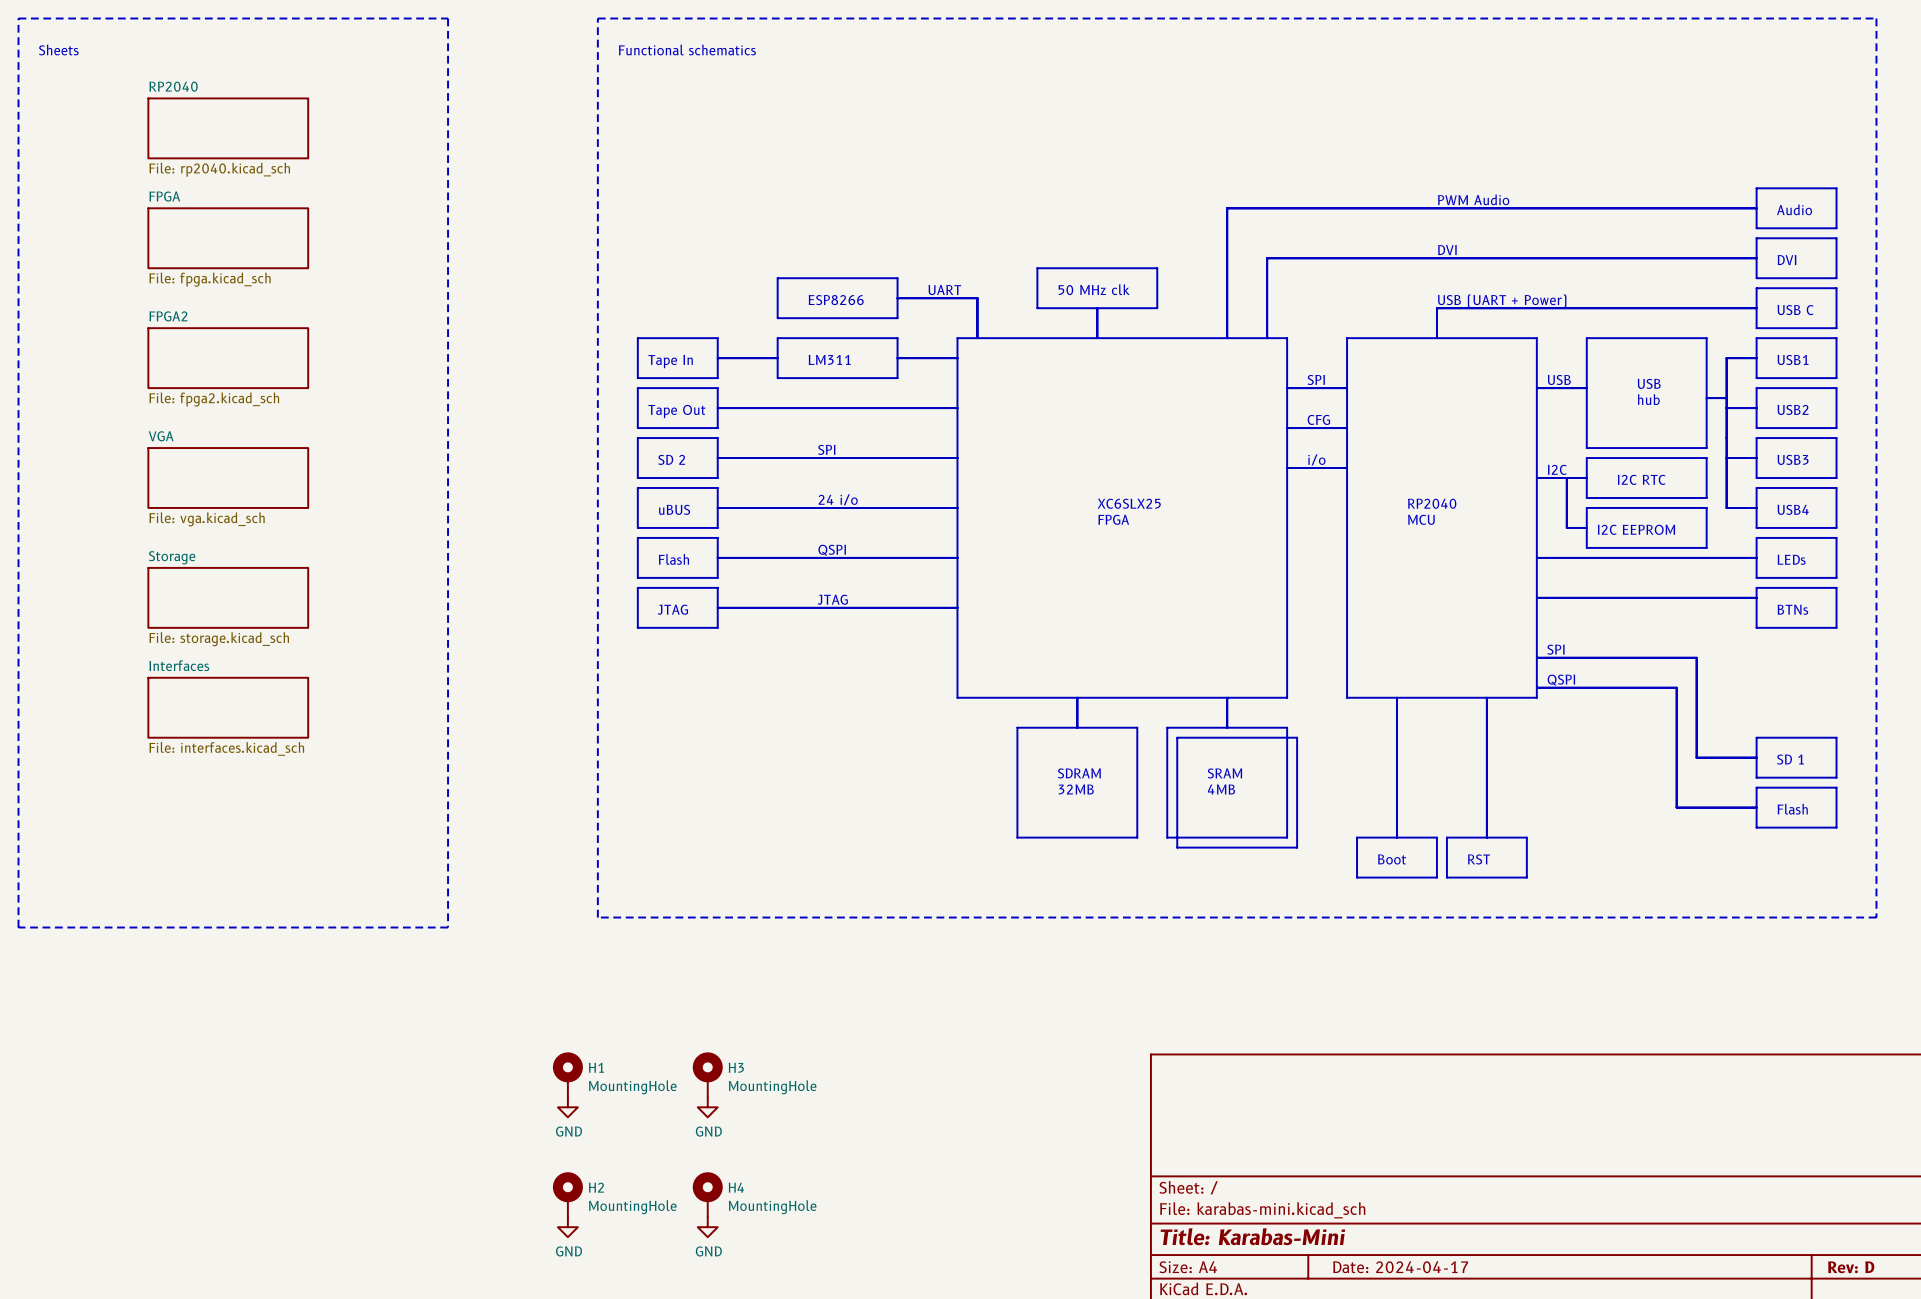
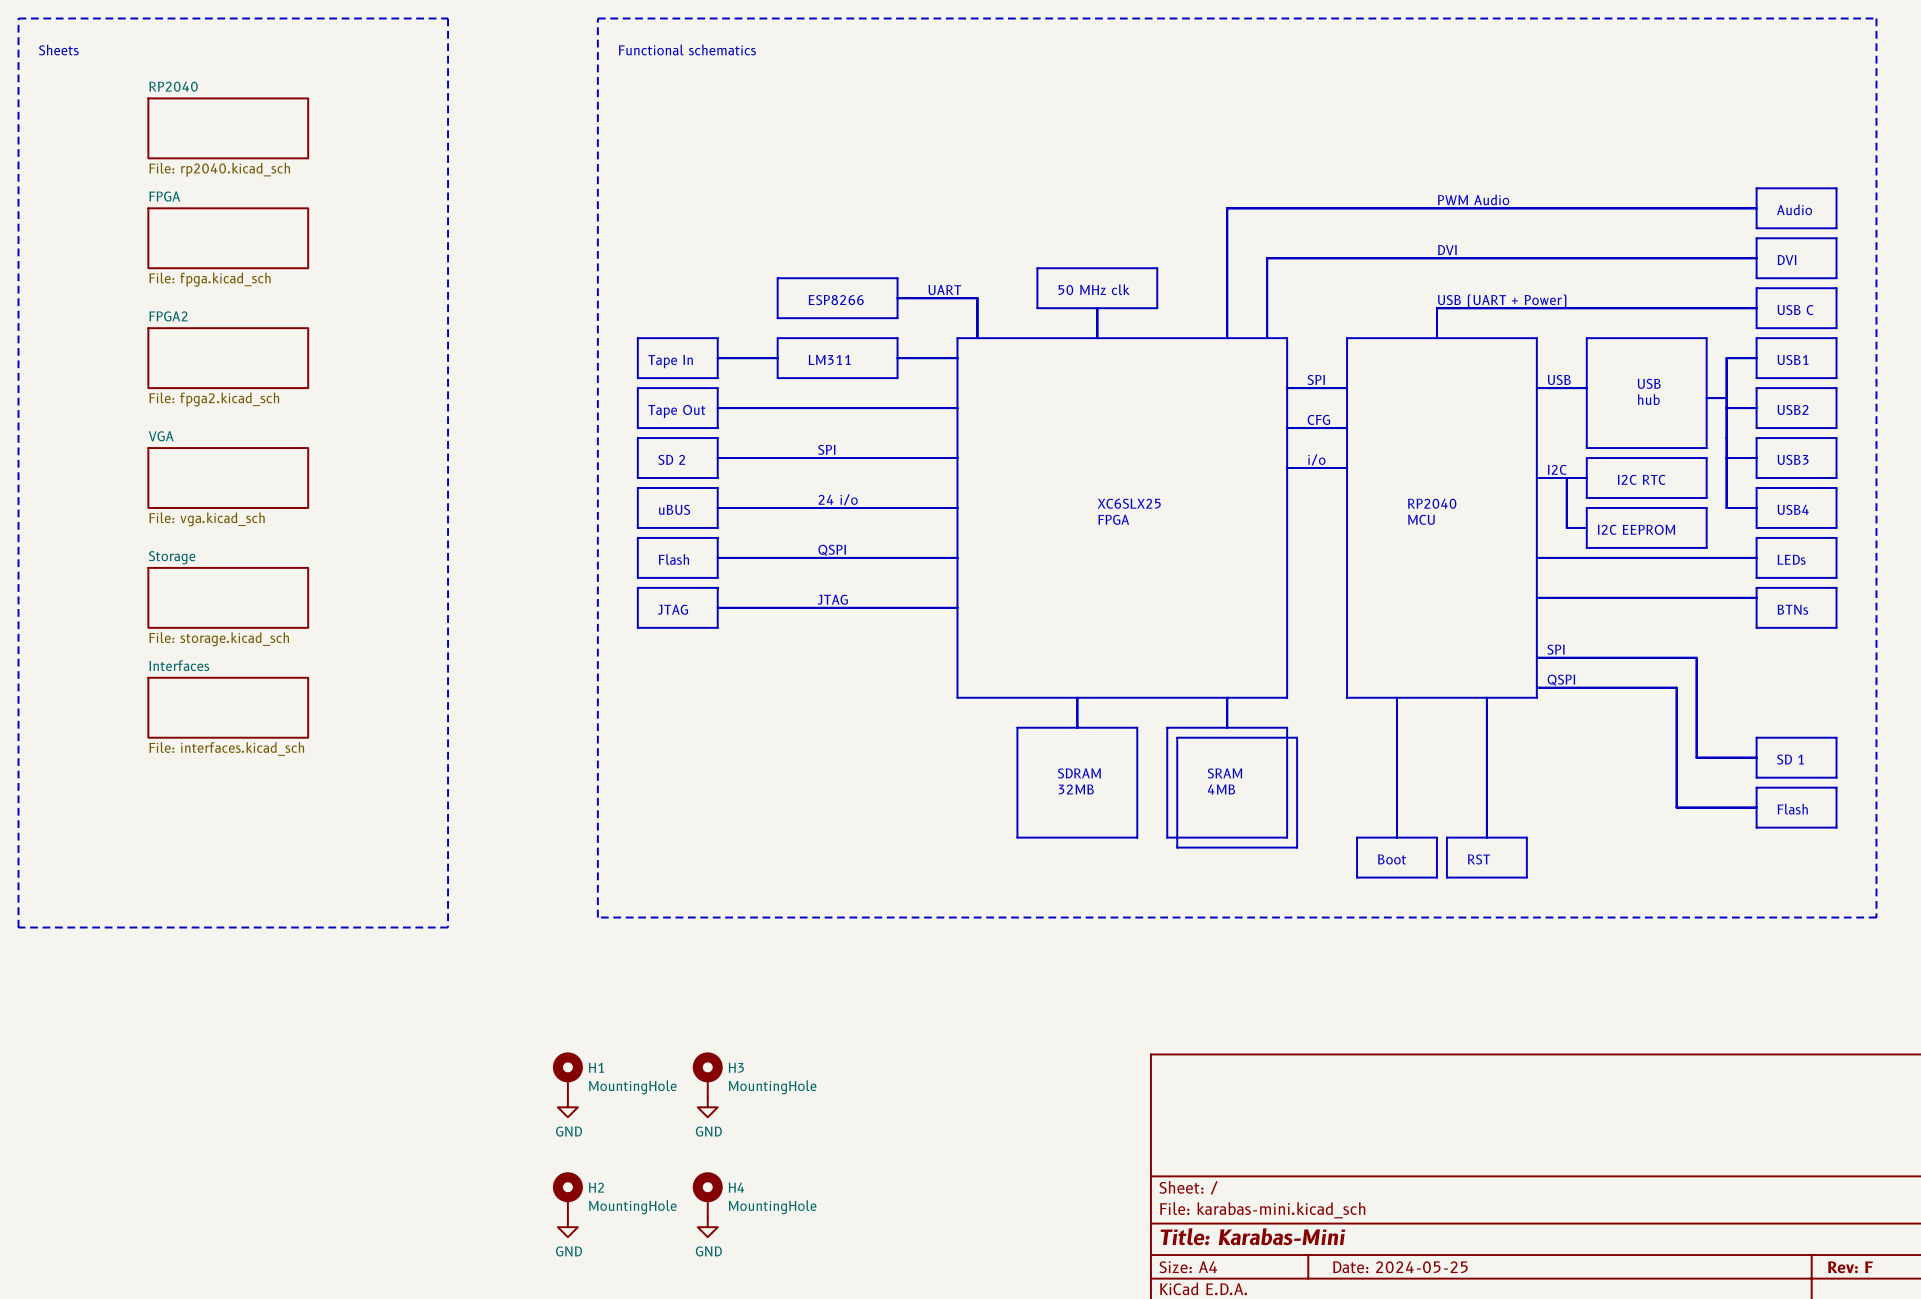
title block: Date: 2024-04-17 (1400, 1267) -> Date: 2024-05-25 (1400, 1267)
title block: Rev: D (1851, 1267) -> Rev: F (1850, 1267)

